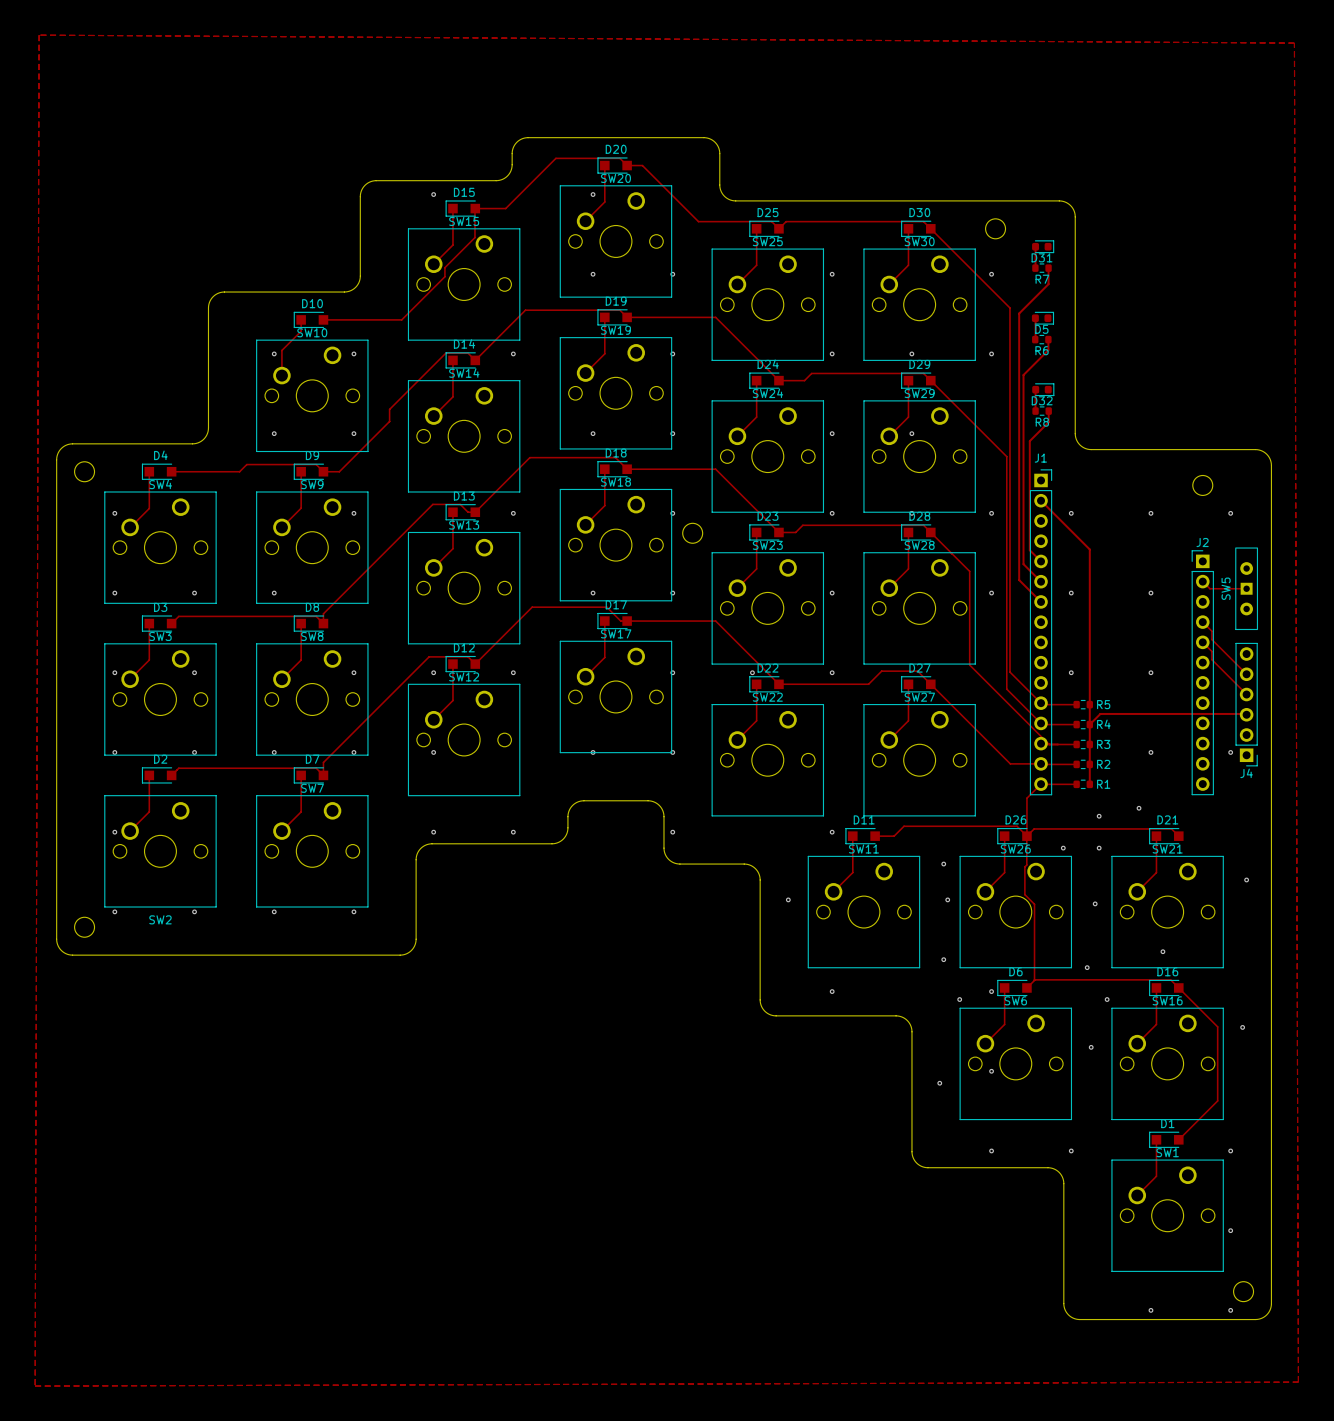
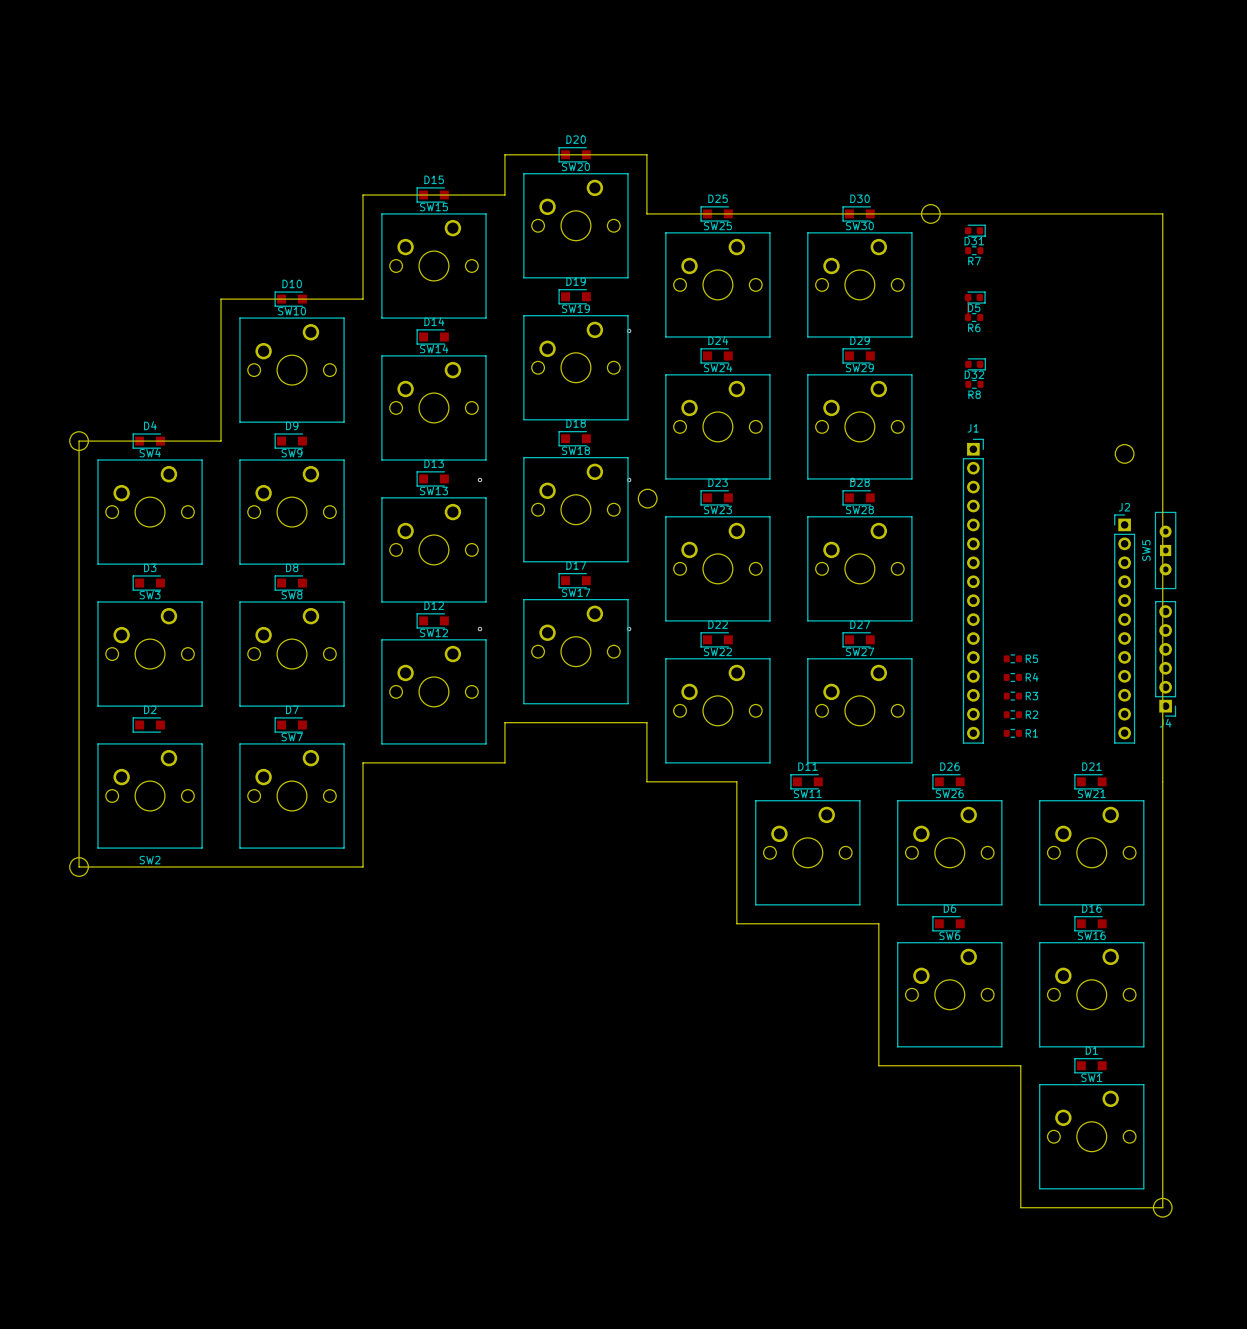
zone outline: (39, 35) (1294, 43) (1298, 1382) (35, 1386) (39, 35) -> none
board edge: (528, 137) (709, 138) (715, 142) (719, 150) (720, 190) (725, 197) (733, 200) (1059, 200) (1066, 202) (1072, 208) (1075, 216) (1075, 433) (1078, 443) (1084, 448) (1091, 449) (1257, 449) (1263, 452) (1269, 457) (1271, 465) (1271, 1303) (1269, 1312) (1263, 1317) (1255, 1319) (1079, 1319) (1069, 1316) (1063, 1305) (1063, 1183) (1060, 1173) (1049, 1167) (927, 1167) (916, 1163) (912, 1153) (911, 1031) (908, 1021) (897, 1015) (776, 1015) (766, 1012) (761, 1006) (760, 999) (758, 873) (754, 867) (745, 864) (679, 864) (671, 861) (666, 856) (664, 849) (663, 811) (659, 805) (653, 801) (583, 800) (576, 802) (568, 811) (566, 834) (561, 840) (555, 843) (432, 843) (423, 846) (418, 851) (416, 857) (415, 942) (411, 950) (403, 954) (72, 955) (65, 953) (59, 947) (56, 939) (56, 459) (59, 451) (64, 446) (70, 443) (192, 443) (201, 441) (206, 436) (208, 429) (208, 307) (213, 296) (224, 292) (351, 290) (356, 286) (360, 277) (360, 194) (366, 184) (376, 180) (499, 180) (506, 177) (510, 171) (514, 145) (521, 139) (528, 137) -> (504, 154) (504, 195) (362, 195) (362, 299) (221, 299) (221, 441) (79, 441) (79, 866) (362, 866) (362, 762) (504, 762) (504, 722) (646, 722) (646, 781) (736, 781) (736, 923) (878, 923) (878, 1065) (1020, 1065) (1020, 1207) (1162, 1207) (1162, 213) (646, 213) (646, 154) (504, 154)
track: (604, 165) (604, 202) (585, 221) -> none
via: (433, 194) -> none
via: (593, 194) -> none
track: (452, 208) (452, 245) (433, 264) -> none
track: (756, 228) (756, 265) (737, 284) -> none
track: (908, 228) (908, 265) (889, 284) -> none
track: (1035, 246) (1035, 268) -> none
track: (1048, 268) (1048, 284) (1019, 313) (1019, 580) (1041, 601) -> none
via: (593, 274) -> none
via: (672, 274) -> none
via: (832, 274) -> none
via: (991, 274) -> none
track: (604, 317) (604, 353) (585, 373) -> none
track: (301, 319) (301, 331) (281, 350) (281, 375) -> none
track: (323, 319) (401, 319) (444, 276) (444, 267) (474, 237) (474, 208) (505, 208) (555, 158) (619, 158) (627, 165) (642, 165) (698, 221) (771, 221) (778, 228) (786, 221) (923, 221) (1009, 308) (1009, 672) (1042, 704) (1076, 704) -> none
track: (1048, 339) (1048, 350) (1023, 375) (1023, 564) (1041, 581) -> none
via: (274, 353) -> none
via: (353, 353) -> none
via: (513, 353) -> none
via: (832, 353) -> none
via: (911, 353) -> none
via: (991, 353) -> none
track: (452, 360) (452, 396) (433, 416) -> none
track: (756, 380) (756, 417) (737, 436) -> none
track: (908, 380) (908, 417) (889, 436) -> none
track: (1035, 389) (1035, 411) -> none
track: (1048, 411) (1048, 422) (1029, 441) (1029, 550) (1041, 561) -> none
via: (274, 433) -> none
via: (353, 433) -> none
via: (593, 433) -> none
via: (672, 433) -> none
via: (832, 433) -> none
via: (911, 433) -> none
track: (604, 469) (604, 505) (585, 524) -> none
track: (149, 471) (149, 508) (130, 527) -> none
track: (171, 471) (239, 471) (246, 464) (316, 464) (323, 471) (339, 471) (389, 421) (389, 409) (445, 353) (468, 353) (475, 360) (525, 310) (619, 310) (627, 317) (715, 317) (778, 380) (804, 380) (811, 373) (923, 373) (1006, 456) (1006, 689) (1042, 724) (1076, 724) -> none
track: (301, 471) (301, 508) (281, 527) -> none
track: (1041, 500) (1089, 549) (1089, 784) -> none
track: (452, 512) (452, 548) (433, 567) -> none
via: (114, 513) -> none
via: (353, 513) -> none
via: (832, 513) -> none
via: (991, 513) -> none
via: (1071, 513) -> none
via: (1150, 513) -> none
via: (1230, 513) -> none
track: (756, 532) (756, 568) (737, 588) -> none
track: (908, 532) (908, 568) (889, 588) -> none
track: (1202, 581) (1209, 588) (1246, 588) -> none
via: (114, 593) -> none
via: (194, 593) -> none
via: (274, 593) -> none
via: (593, 593) -> none
via: (672, 593) -> none
via: (832, 593) -> none
via: (991, 593) -> none
via: (1071, 593) -> none
via: (1150, 593) -> none
track: (604, 621) (604, 657) (585, 676) -> none
track: (1202, 622) (1211, 631) (1211, 639) (1246, 674) -> none
track: (149, 623) (149, 660) (130, 679) -> none
track: (171, 623) (178, 616) (316, 616) (323, 623) (323, 613) (432, 504) (460, 504) (468, 512) (475, 512) (529, 457) (615, 457) (627, 469) (715, 469) (778, 532) (795, 532) (802, 525) (923, 525) (969, 571) (969, 665) (1049, 744) -> none
track: (301, 623) (301, 660) (281, 679) -> none
track: (1202, 642) (1211, 651) (1211, 659) (1246, 694) -> none
track: (452, 664) (452, 700) (433, 719) -> none
via: (114, 672) -> none
via: (194, 672) -> none
via: (353, 672) -> none
via: (433, 672) -> none
via: (752, 672) -> none
via: (832, 672) -> none
via: (1071, 672) -> none
via: (1150, 672) -> none
track: (756, 684) (756, 720) (737, 739) -> none
track: (778, 684) (715, 621) (620, 621) (606, 607) (532, 607) (475, 664) (468, 656) (429, 656) (323, 762) (323, 775) (316, 768) (178, 768) (171, 775) -> none
track: (779, 684) (868, 684) (881, 671) (917, 671) (1010, 763) (1076, 764) -> none
track: (908, 684) (908, 720) (889, 739) -> none
track: (1246, 714) (1100, 713) (1089, 724) -> none
track: (1041, 743) (1076, 744) -> none
via: (114, 752) -> none
via: (194, 752) -> none
via: (274, 752) -> none
via: (353, 752) -> none
via: (433, 752) -> none
via: (593, 752) -> none
via: (672, 752) -> none
via: (1150, 752) -> none
via: (1230, 752) -> none
track: (149, 775) (149, 811) (130, 831) -> none
track: (301, 775) (301, 811) (281, 831) -> none
track: (1076, 784) (1041, 784) (1026, 798) (1026, 836) (1017, 826) (904, 826) (894, 836) (875, 836) -> none
via: (1139, 808) -> none
via: (1099, 816) -> none
via: (114, 832) -> none
via: (433, 832) -> none
via: (513, 832) -> none
via: (672, 832) -> none
via: (832, 832) -> none
track: (852, 836) (852, 872) (833, 891) -> none
track: (1004, 836) (1004, 872) (985, 891) -> none
track: (1156, 836) (1156, 872) (1137, 891) -> none
track: (1178, 836) (1171, 828) (1034, 828) (1026, 836) (1024, 894) (1034, 904) (1034, 980) (1026, 987) -> none
via: (1063, 848) -> none
via: (1099, 848) -> none
via: (943, 864) -> none
via: (1246, 879) -> none
via: (788, 899) -> none
via: (947, 899) -> none
via: (1095, 903) -> none
via: (114, 911) -> none
via: (194, 911) -> none
via: (274, 911) -> none
via: (353, 911) -> none
via: (1162, 951) -> none
via: (943, 959) -> none
via: (1087, 967) -> none
track: (1034, 979) (1170, 979) (1217, 1026) (1217, 1100) (1178, 1139) -> none
track: (1004, 987) (1004, 1024) (985, 1043) -> none
track: (1156, 987) (1156, 1024) (1137, 1043) -> none
via: (832, 991) -> none
via: (991, 991) -> none
via: (959, 999) -> none
via: (1107, 999) -> none
via: (1242, 1027) -> none
via: (1091, 1047) -> none
via: (991, 1071) -> none
via: (939, 1083) -> none
track: (1156, 1139) (1156, 1176) (1137, 1195) -> none
via: (991, 1150) -> none
via: (1071, 1150) -> none
via: (1230, 1150) -> none
via: (1230, 1230) -> none
via: (1150, 1310) -> none
via: (1230, 1310) -> none

